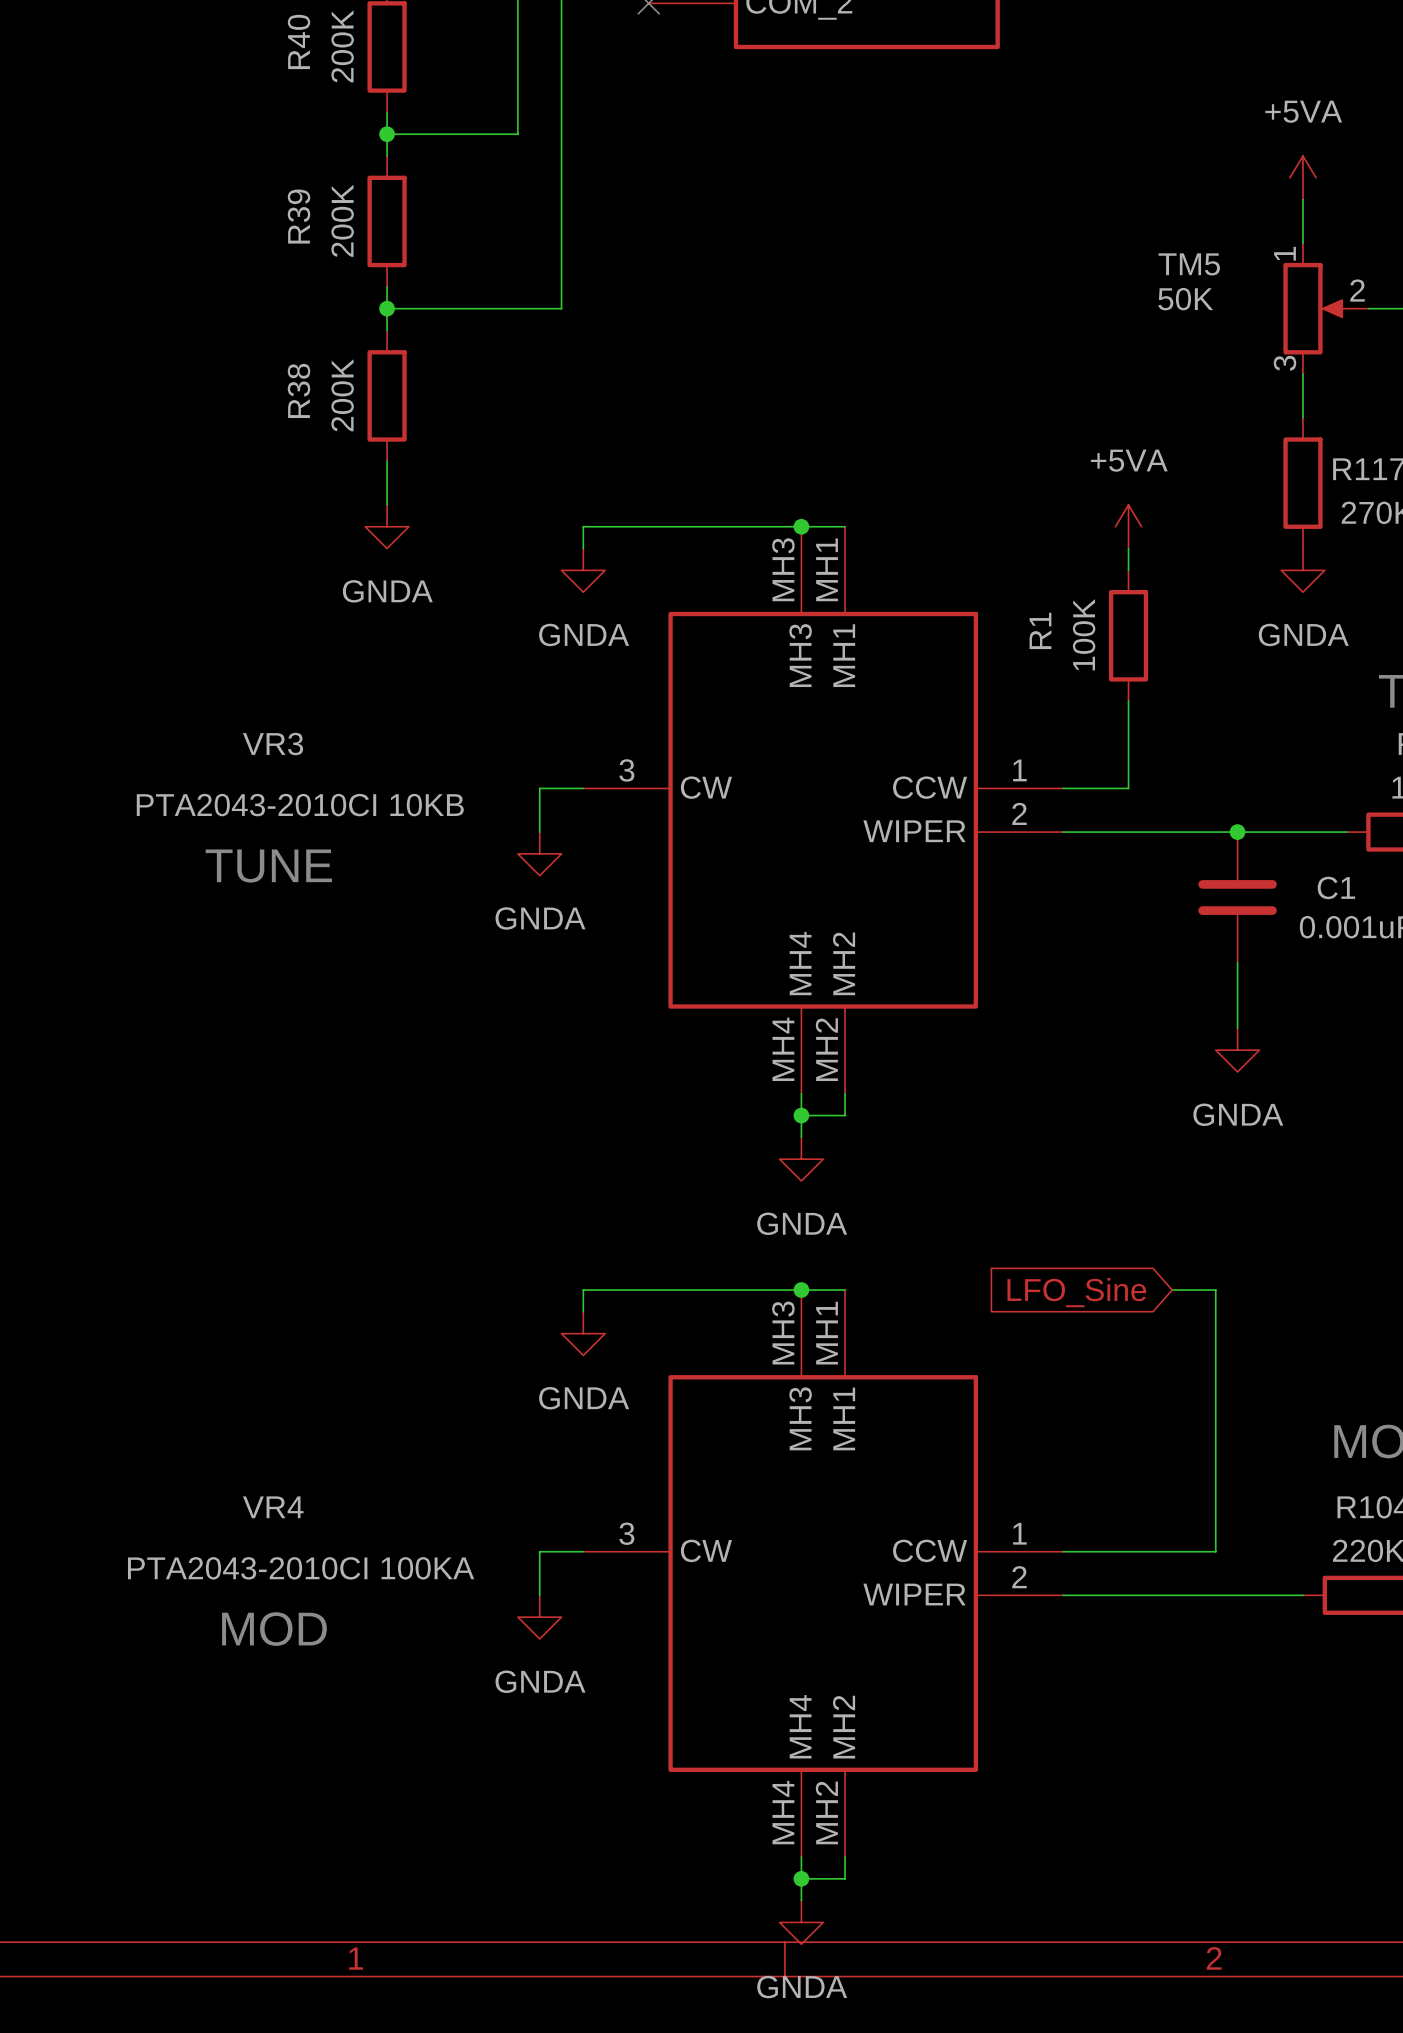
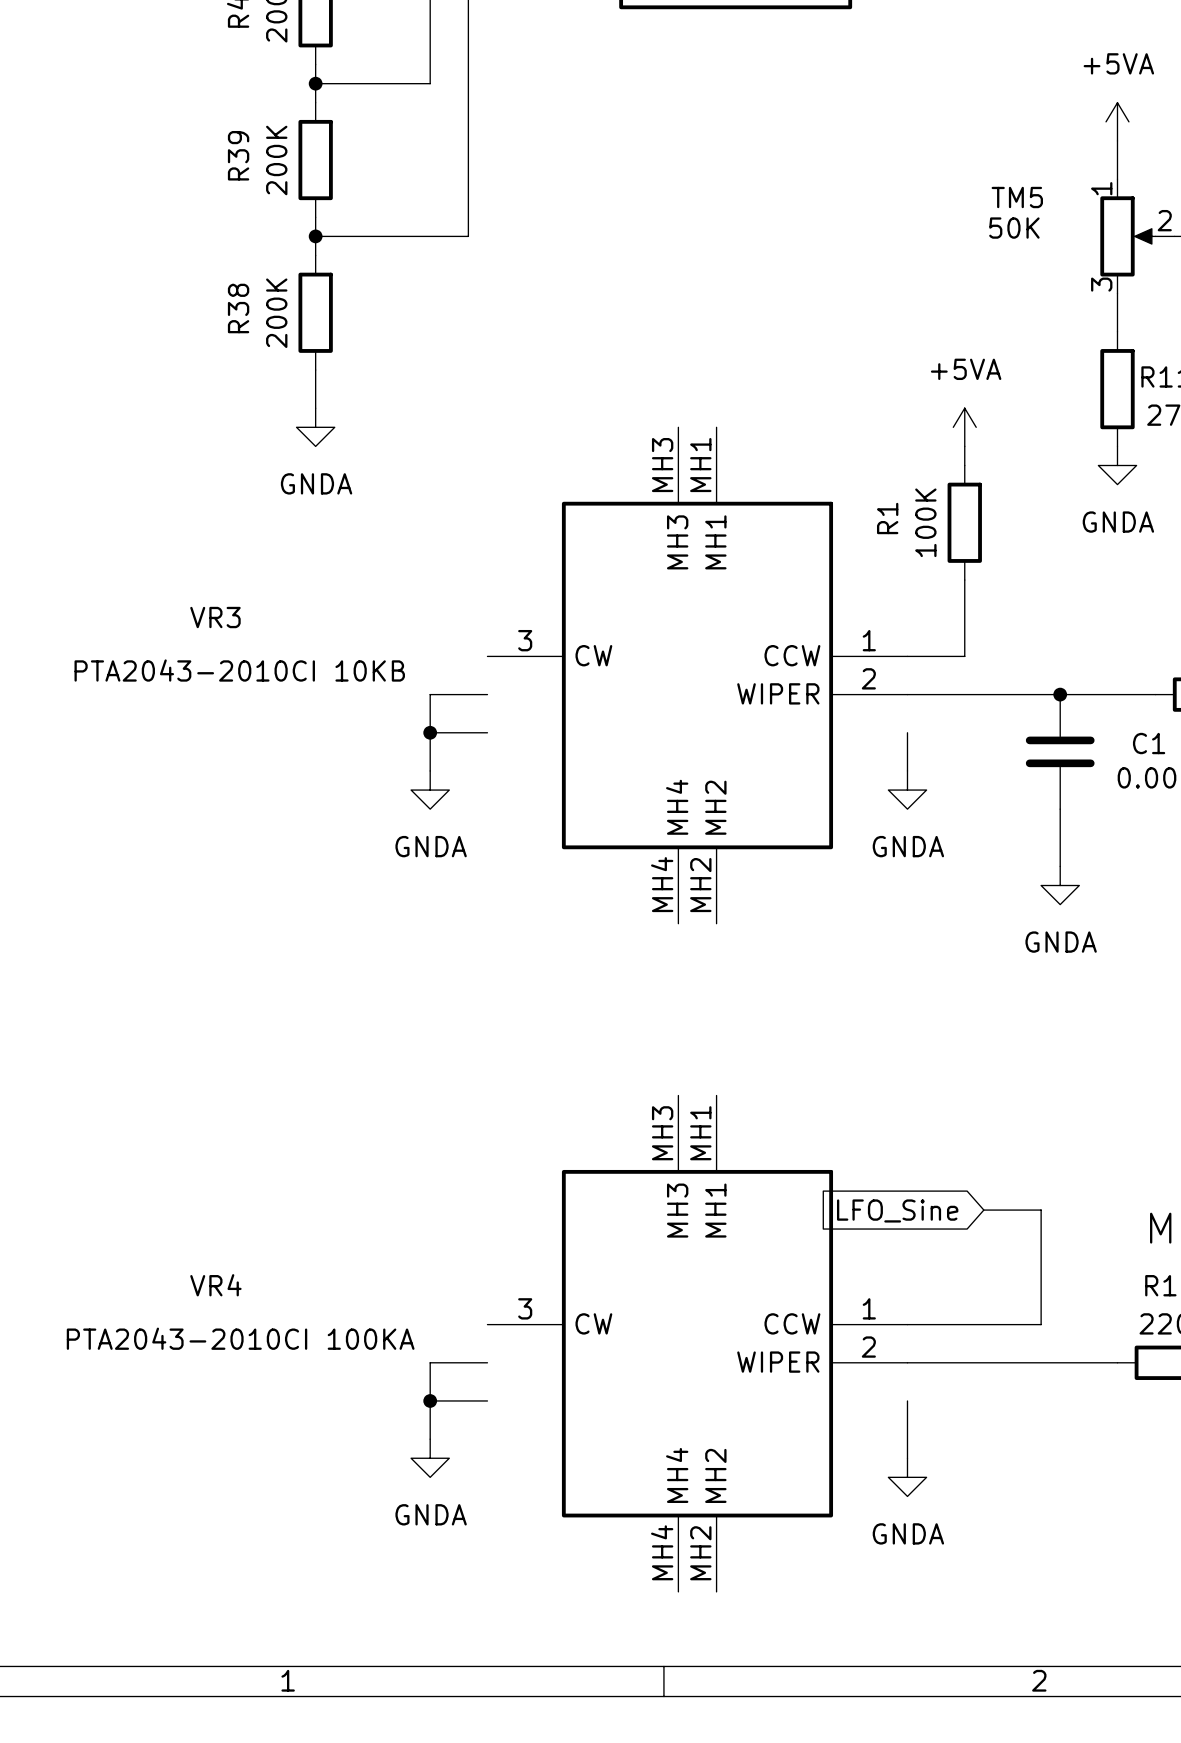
junction: (801, 526) -> none
wire: (845, 526) (583, 526) (583, 548) -> none
power symbol: GNDA (583, 570) -> none
wire: (583, 788) (539, 788) (539, 832) -> none
wire: none -> (487, 694) (430, 694) (430, 770)
power symbol position: GNDA (539, 853) -> GNDA (430, 790)
text: TUNE (268, 866) -> none
wire: none -> (430, 732) (487, 732)
junction: none -> (430, 732)
power symbol: none -> GNDA (907, 790)
wire: (801, 1093) (801, 1137) -> (907, 732) (907, 770)
wire: (845, 1093) (845, 1115) (801, 1115) -> none
junction: (801, 1115) -> none
power symbol: GNDA (801, 1159) -> none
junction: (801, 1290) -> none
wire: (845, 1290) (583, 1290) (583, 1311) -> none
wire: (1172, 1290) (1215, 1290) (1215, 1420) -> (983, 1210) (1041, 1210)
global label position: LFO_Sine (1076, 1292) -> LFO_Sine (897, 1210)
power symbol: GNDA (583, 1333) -> none
wire: (583, 1551) (539, 1551) (539, 1595) -> none
wire: none -> (487, 1362) (430, 1362) (430, 1439)
power symbol position: GNDA (539, 1617) -> GNDA (430, 1458)
text: MOD (274, 1629) -> none
wire: none -> (430, 1400) (487, 1400)
junction: none -> (430, 1400)
wire: none -> (907, 1400) (907, 1458)
power symbol: none -> GNDA (907, 1477)
wire: (801, 1857) (801, 1900) -> none
wire: (845, 1857) (845, 1878) (801, 1878) -> none
junction: (801, 1878) -> none
power symbol: GNDA (801, 1922) -> none

